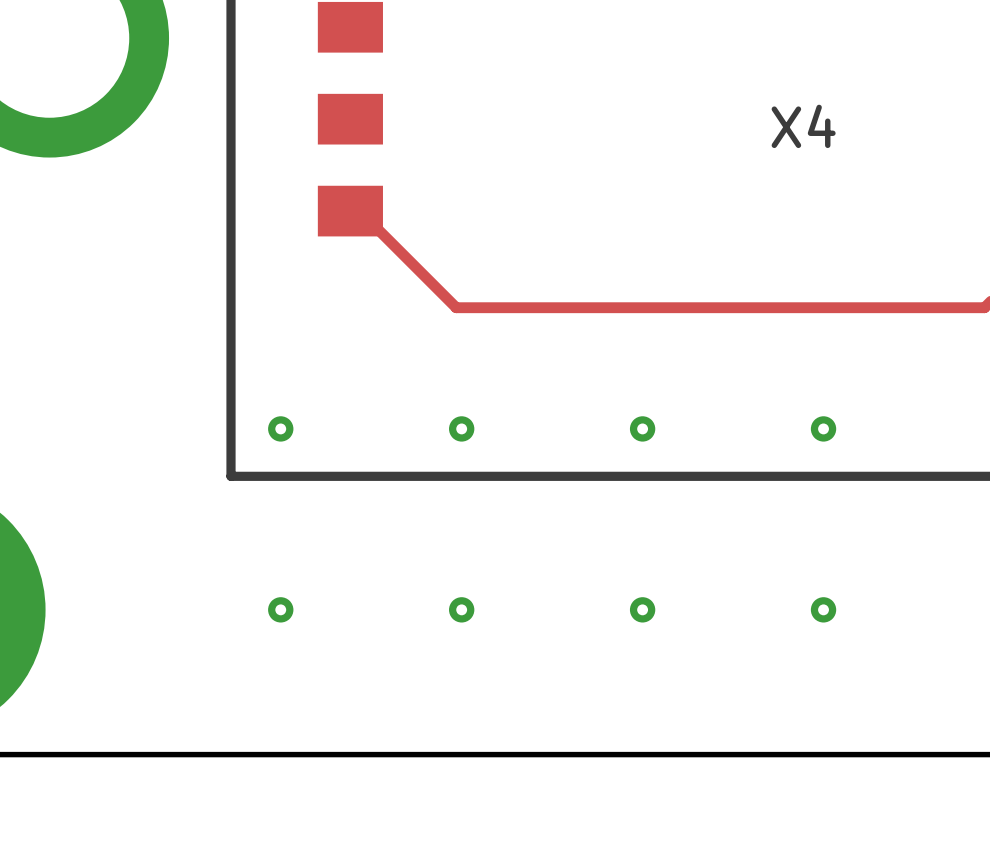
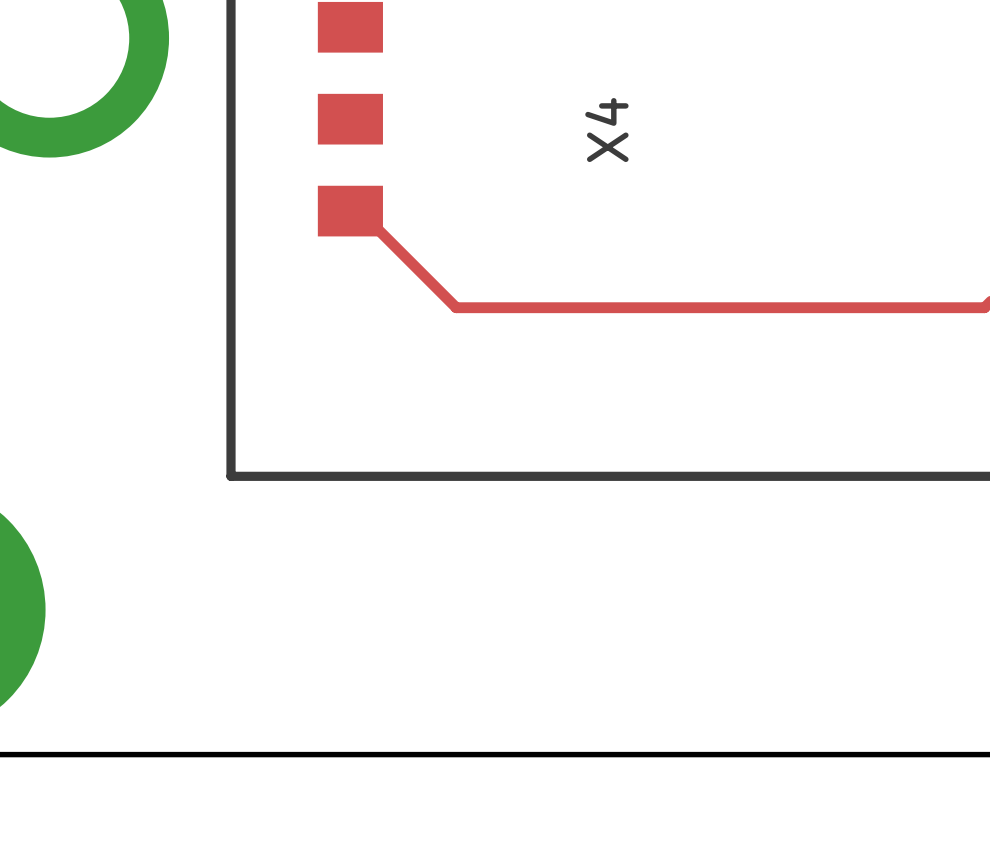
X4 name rotation: 0° (803, 126) -> 90° counterclockwise (606, 130)
X4 name position: X4 (803, 126) -> X4 (606, 130)
via: (280, 428) -> none
via: (461, 428) -> none
via: (642, 428) -> none
via: (823, 428) -> none
via: (280, 609) -> none
via: (461, 609) -> none
via: (642, 609) -> none
via: (823, 609) -> none

